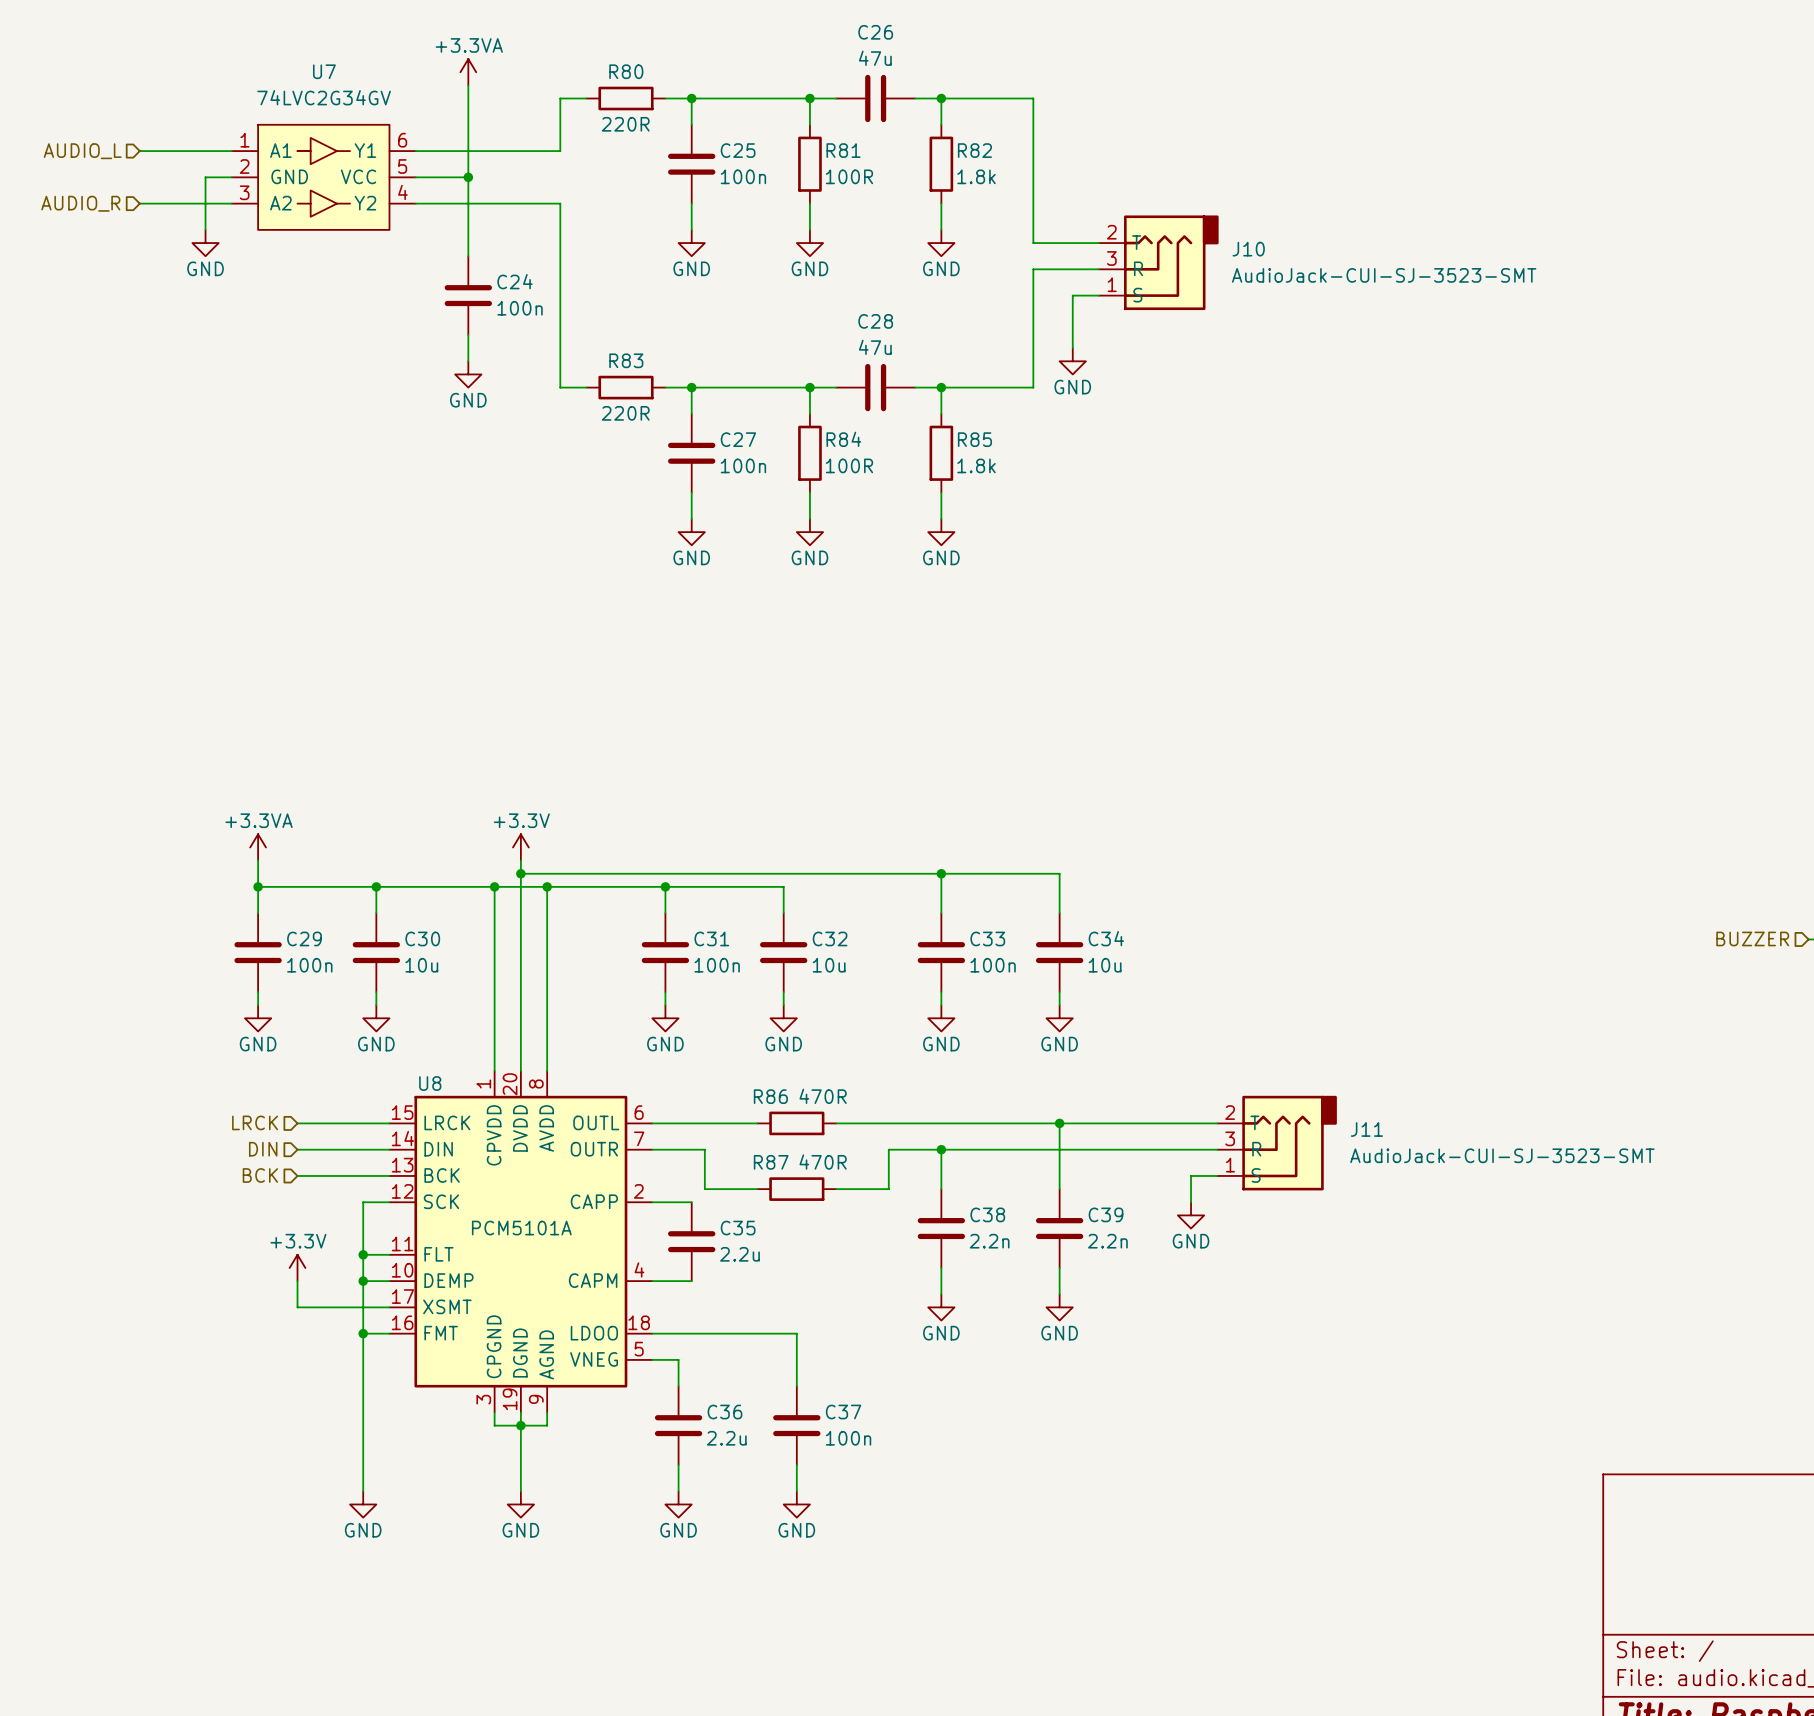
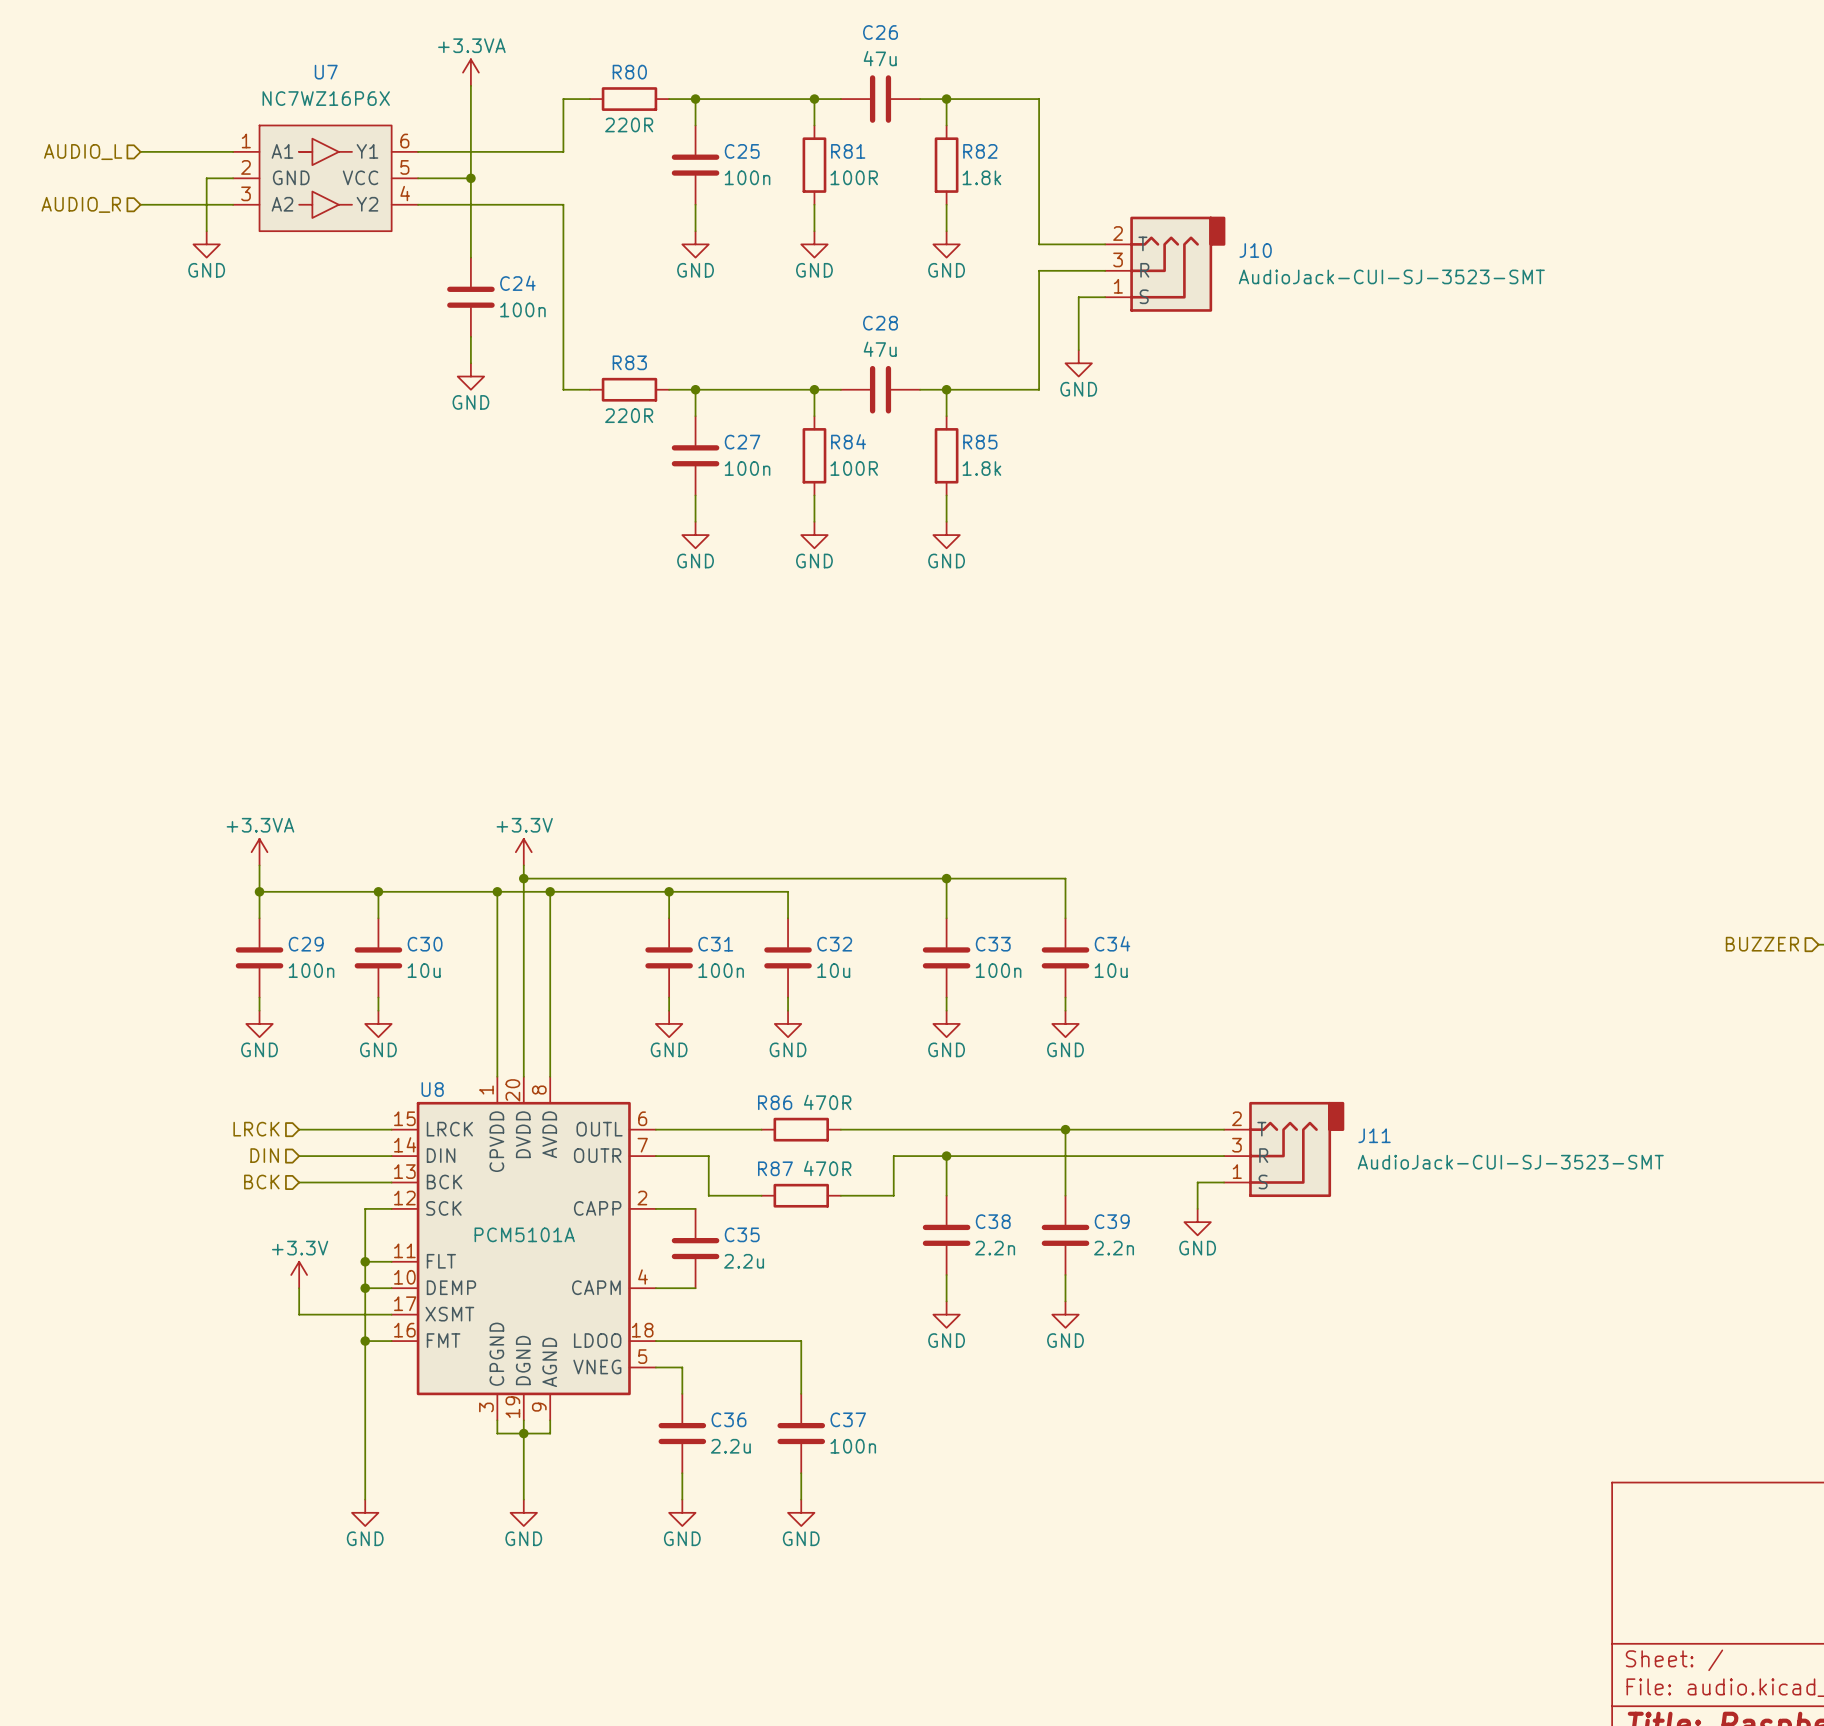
U7 value: 74LVC2G34GV (324, 97) -> NC7WZ16P6X (326, 98)

